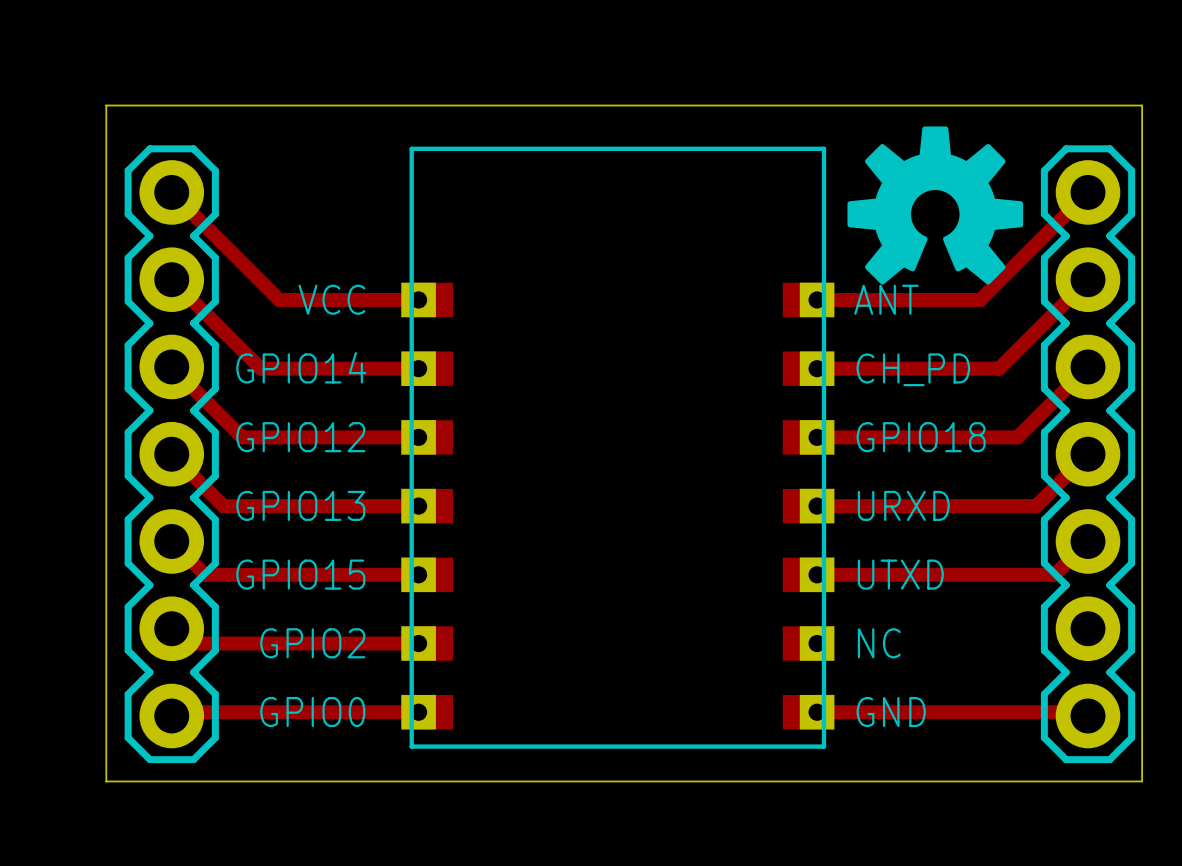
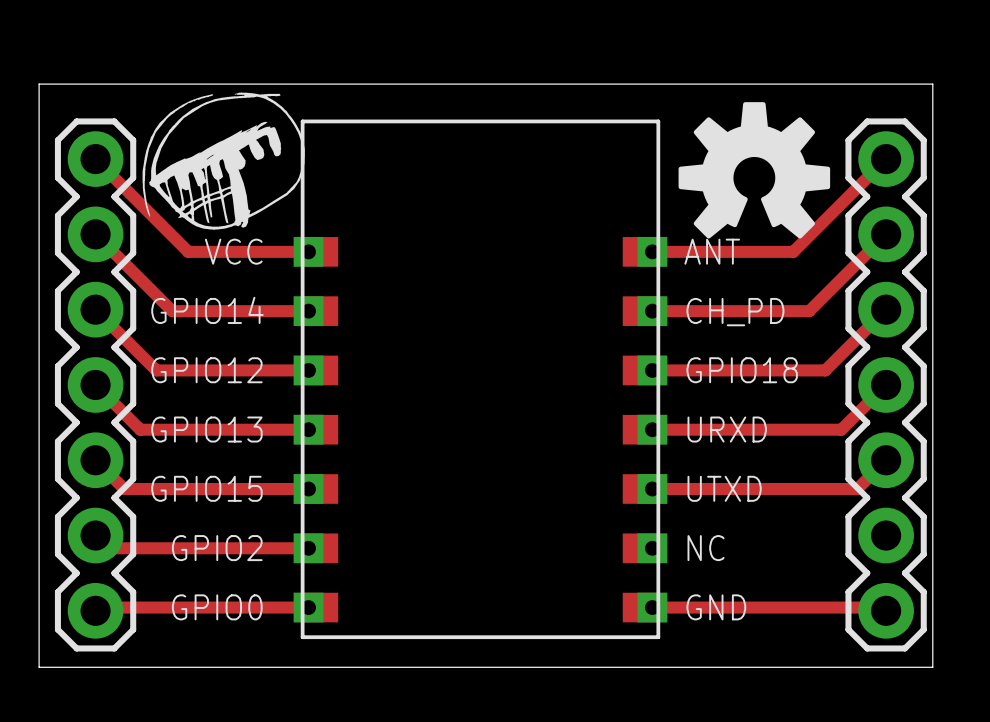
drawing: none -> [142, 92, 305, 230]

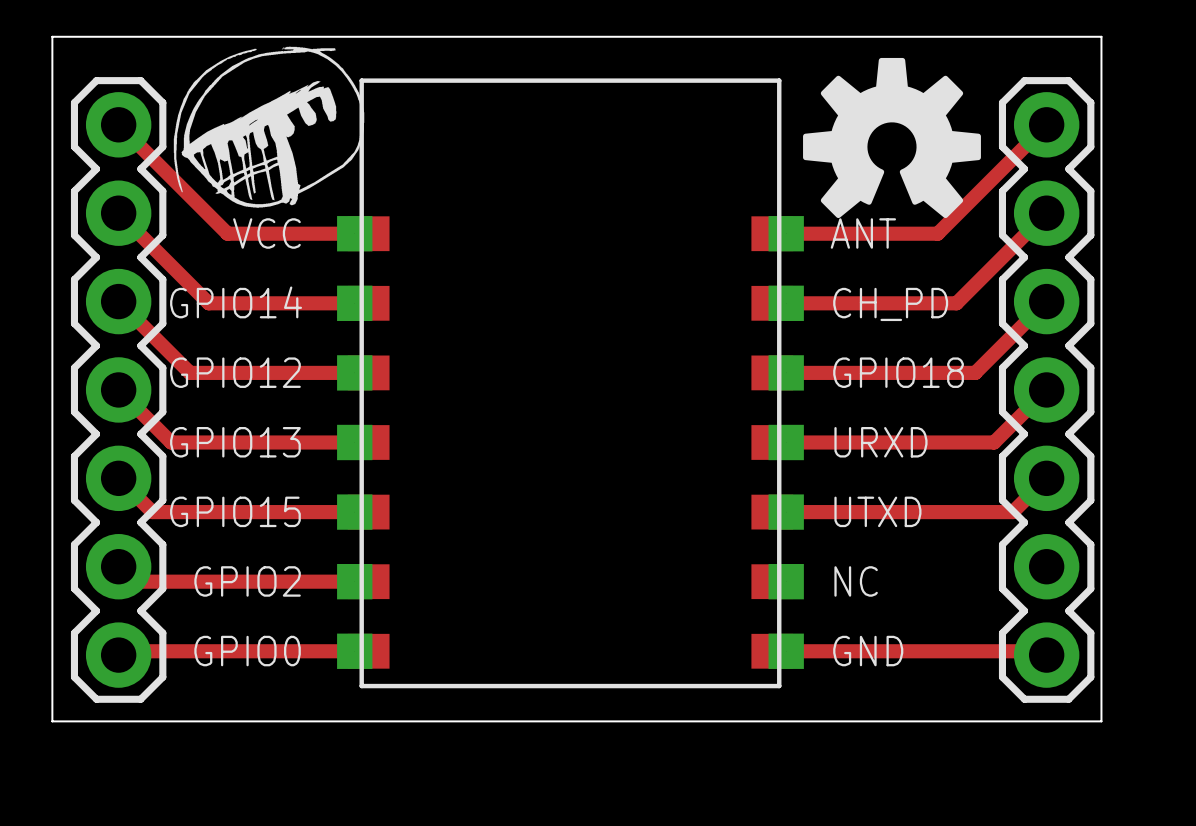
part footprint: [293, 119, 668, 640] -> [337, 78, 804, 689]

